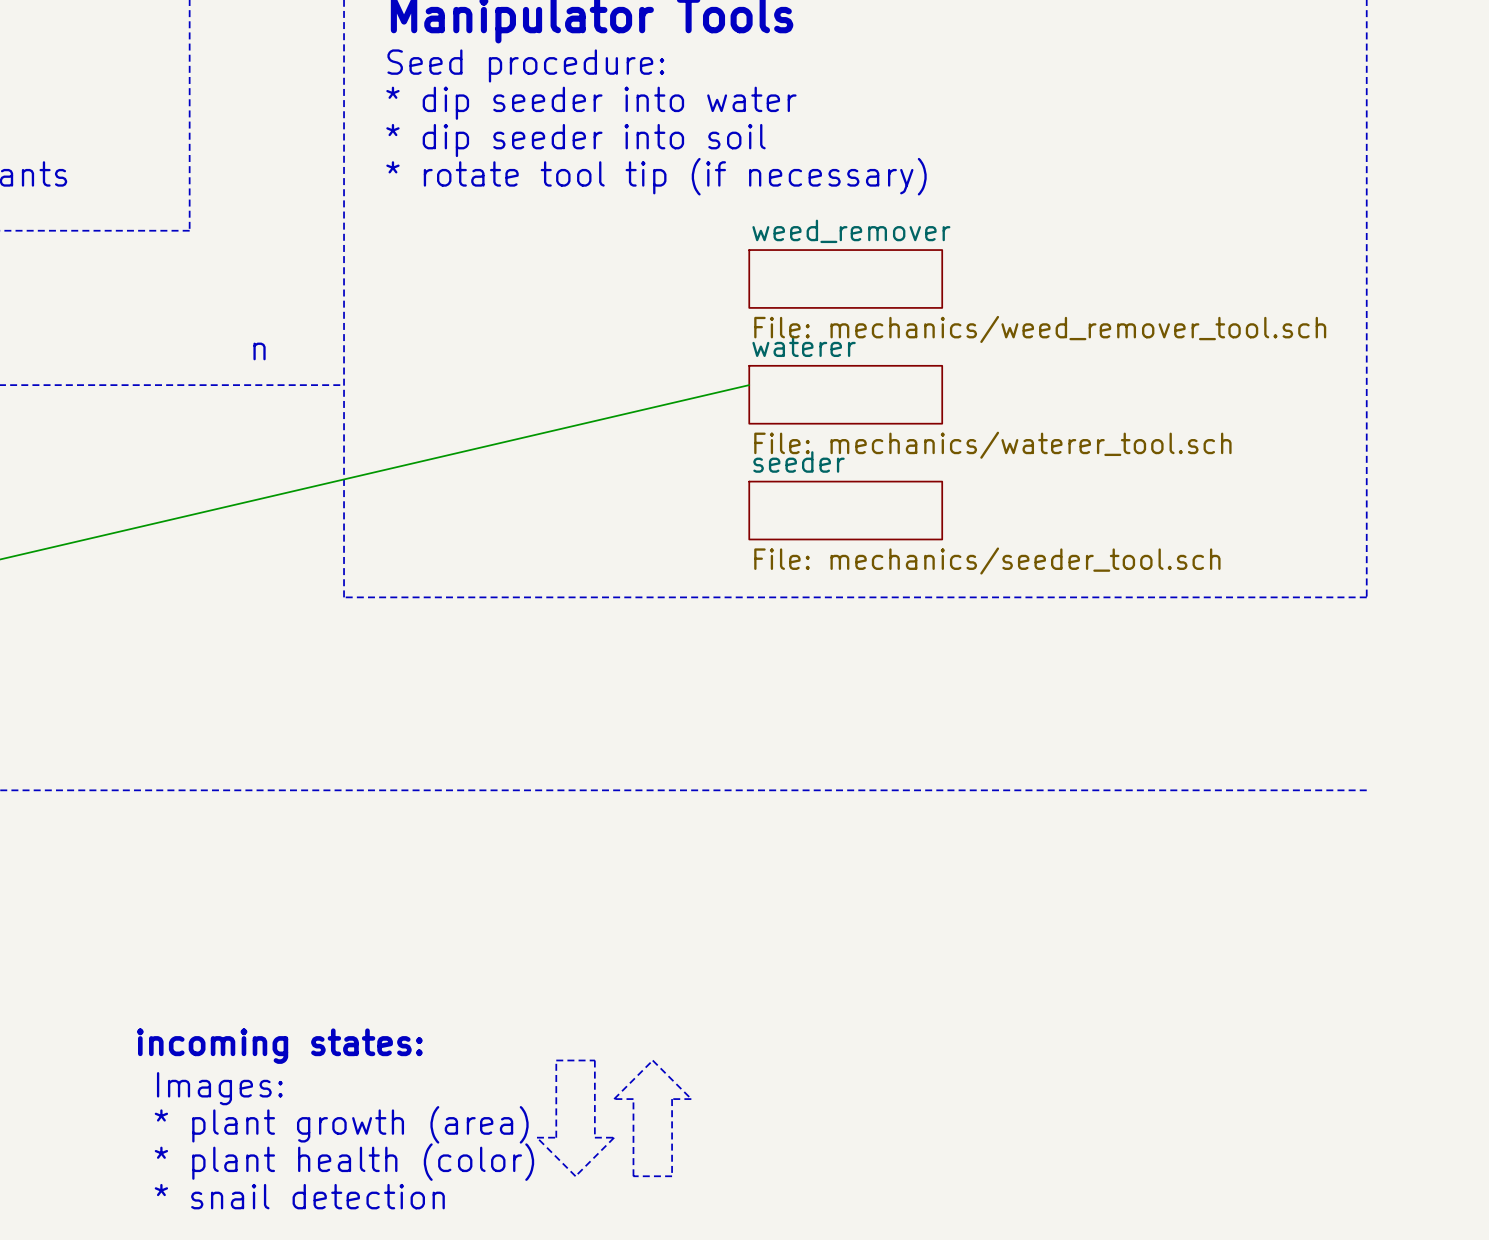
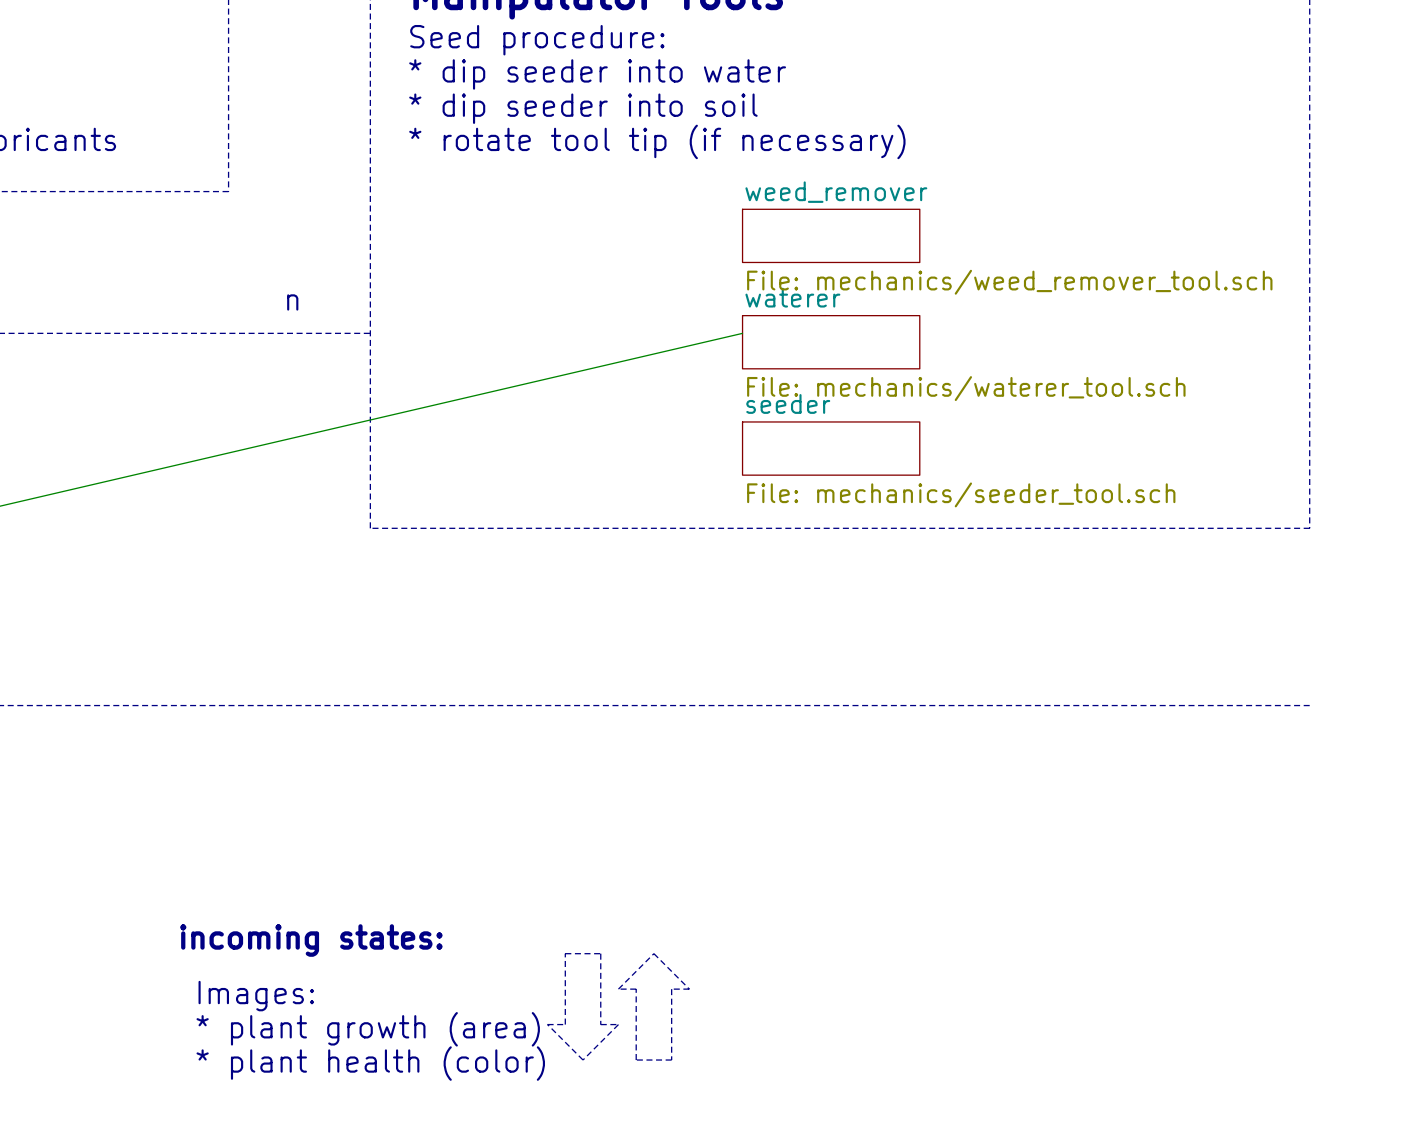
text position: Images: (219, 1088) -> Images: (256, 996)
text position: * plant growth (area) (341, 1124) -> * plant growth (area) (368, 1029)
text position: * plant health (color) (344, 1162) -> * plant health (color) (370, 1063)
text: * snail detection (299, 1196) -> none

